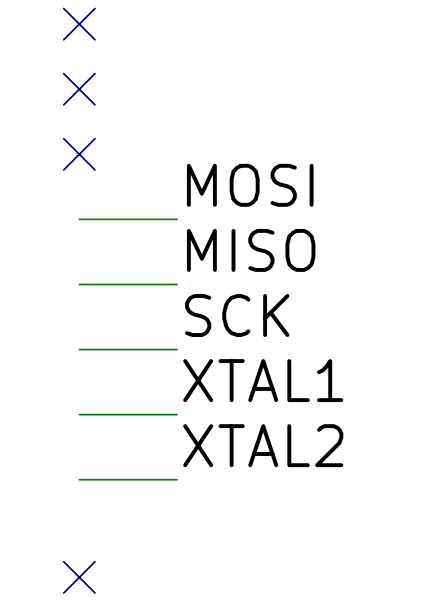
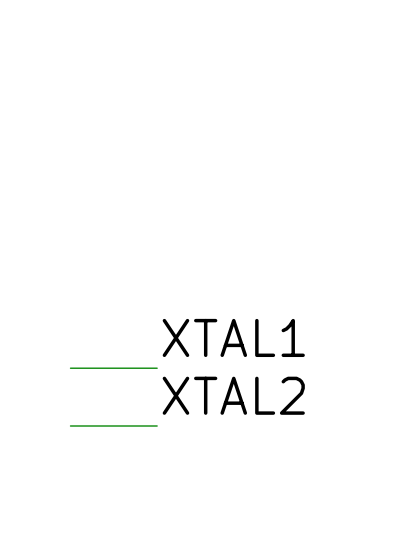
no-connect mark: (79, 24) -> none
no-connect mark: (79, 89) -> none
no-connect mark: (79, 154) -> none
label: MOSI (250, 185) -> none
wire: (79, 219) (176, 219) -> none
label: MISO (251, 250) -> none
wire: (79, 284) (176, 284) -> none
label: SCK (237, 315) -> none
wire: (79, 349) (176, 349) -> none
no-connect mark: (79, 577) -> none

